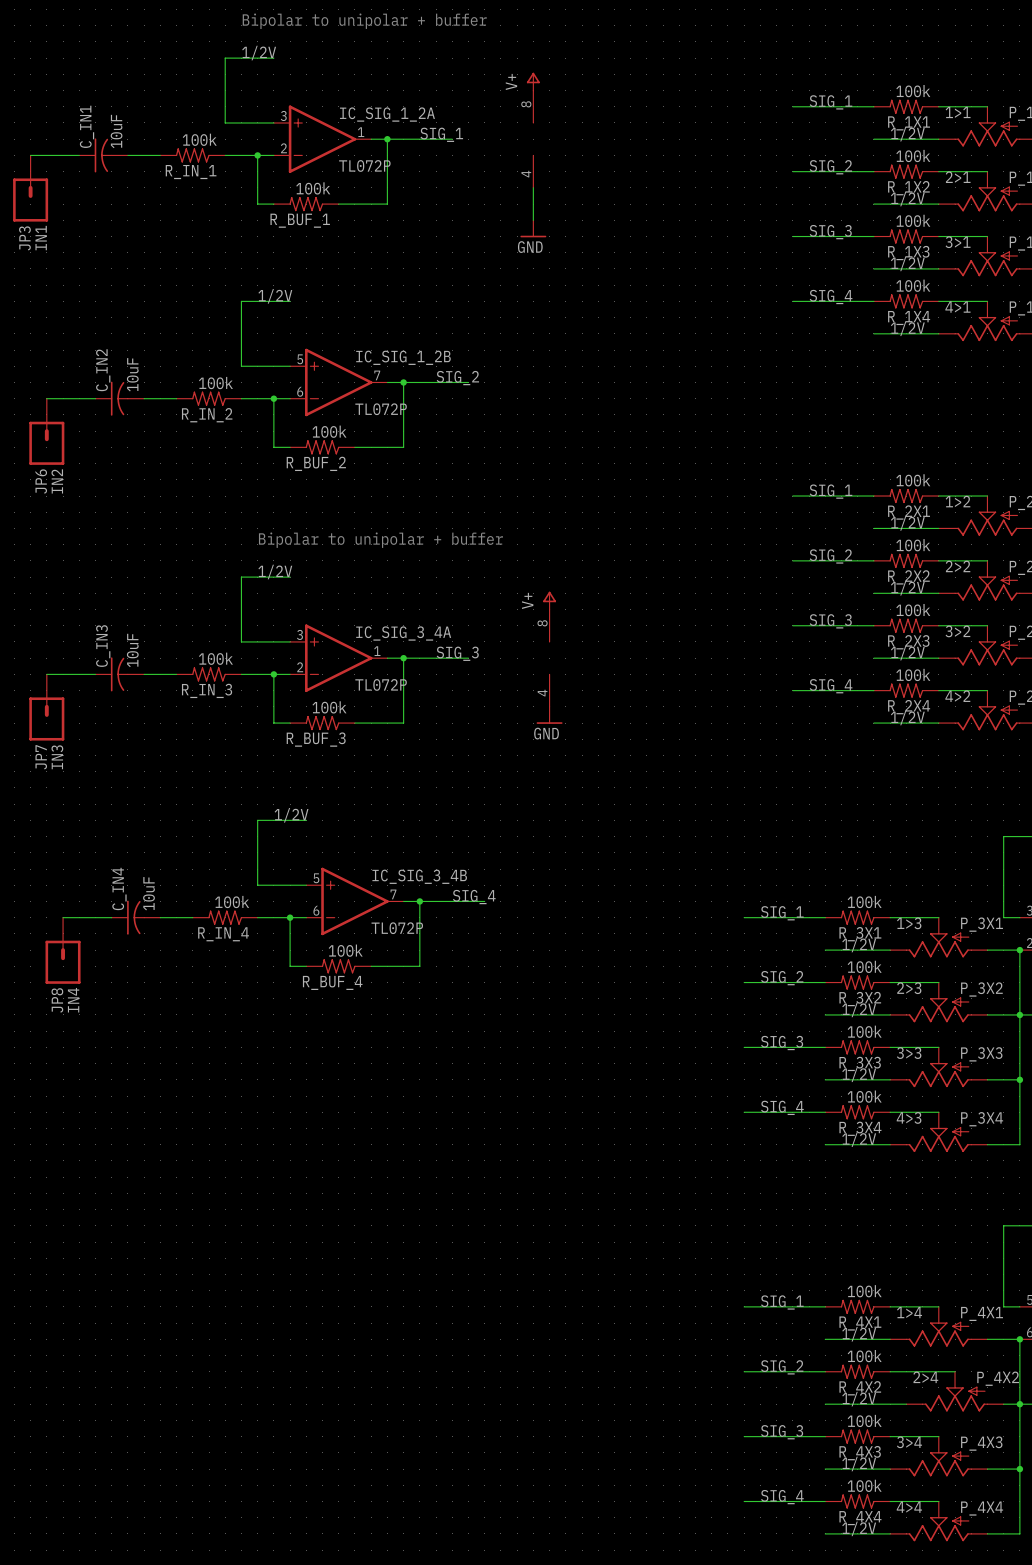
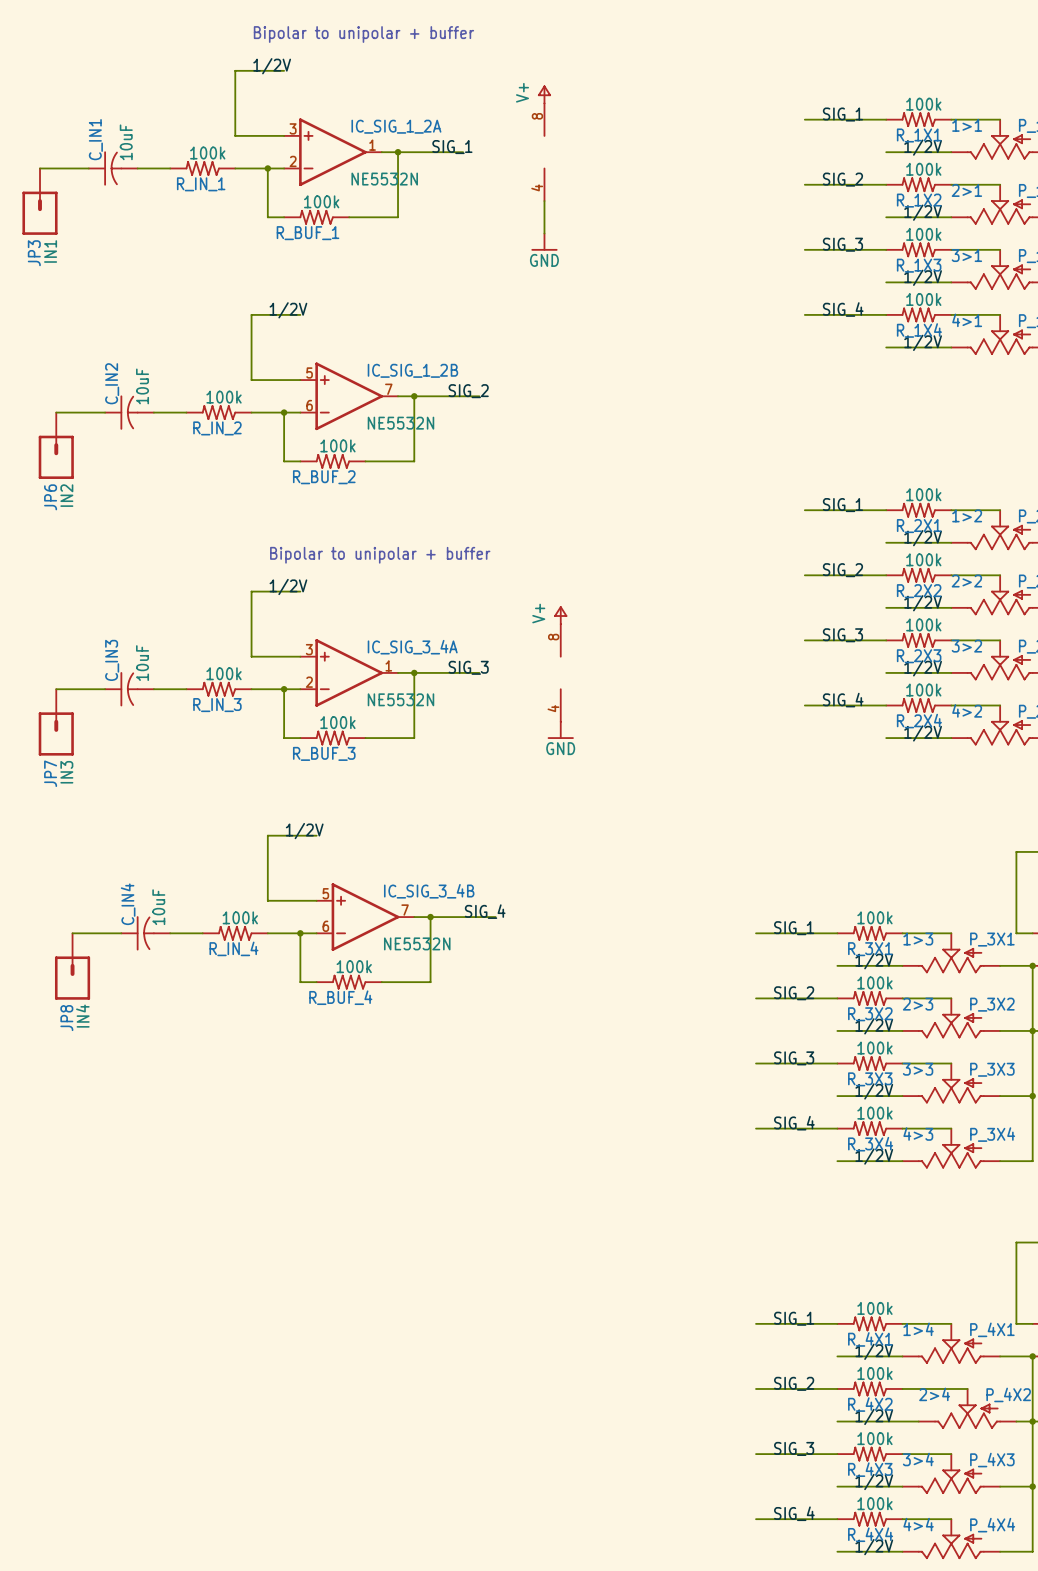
IC_SIG_1_2A value: TL072P (364, 165) -> NE5532N (384, 179)
IC_SIG_1_2B value: TL072P (381, 409) -> NE5532N (400, 423)
IC_SIG_3_4A value: TL072P (381, 684) -> NE5532N (400, 699)
IC_SIG_3_4B value: TL072P (397, 928) -> NE5532N (417, 943)

